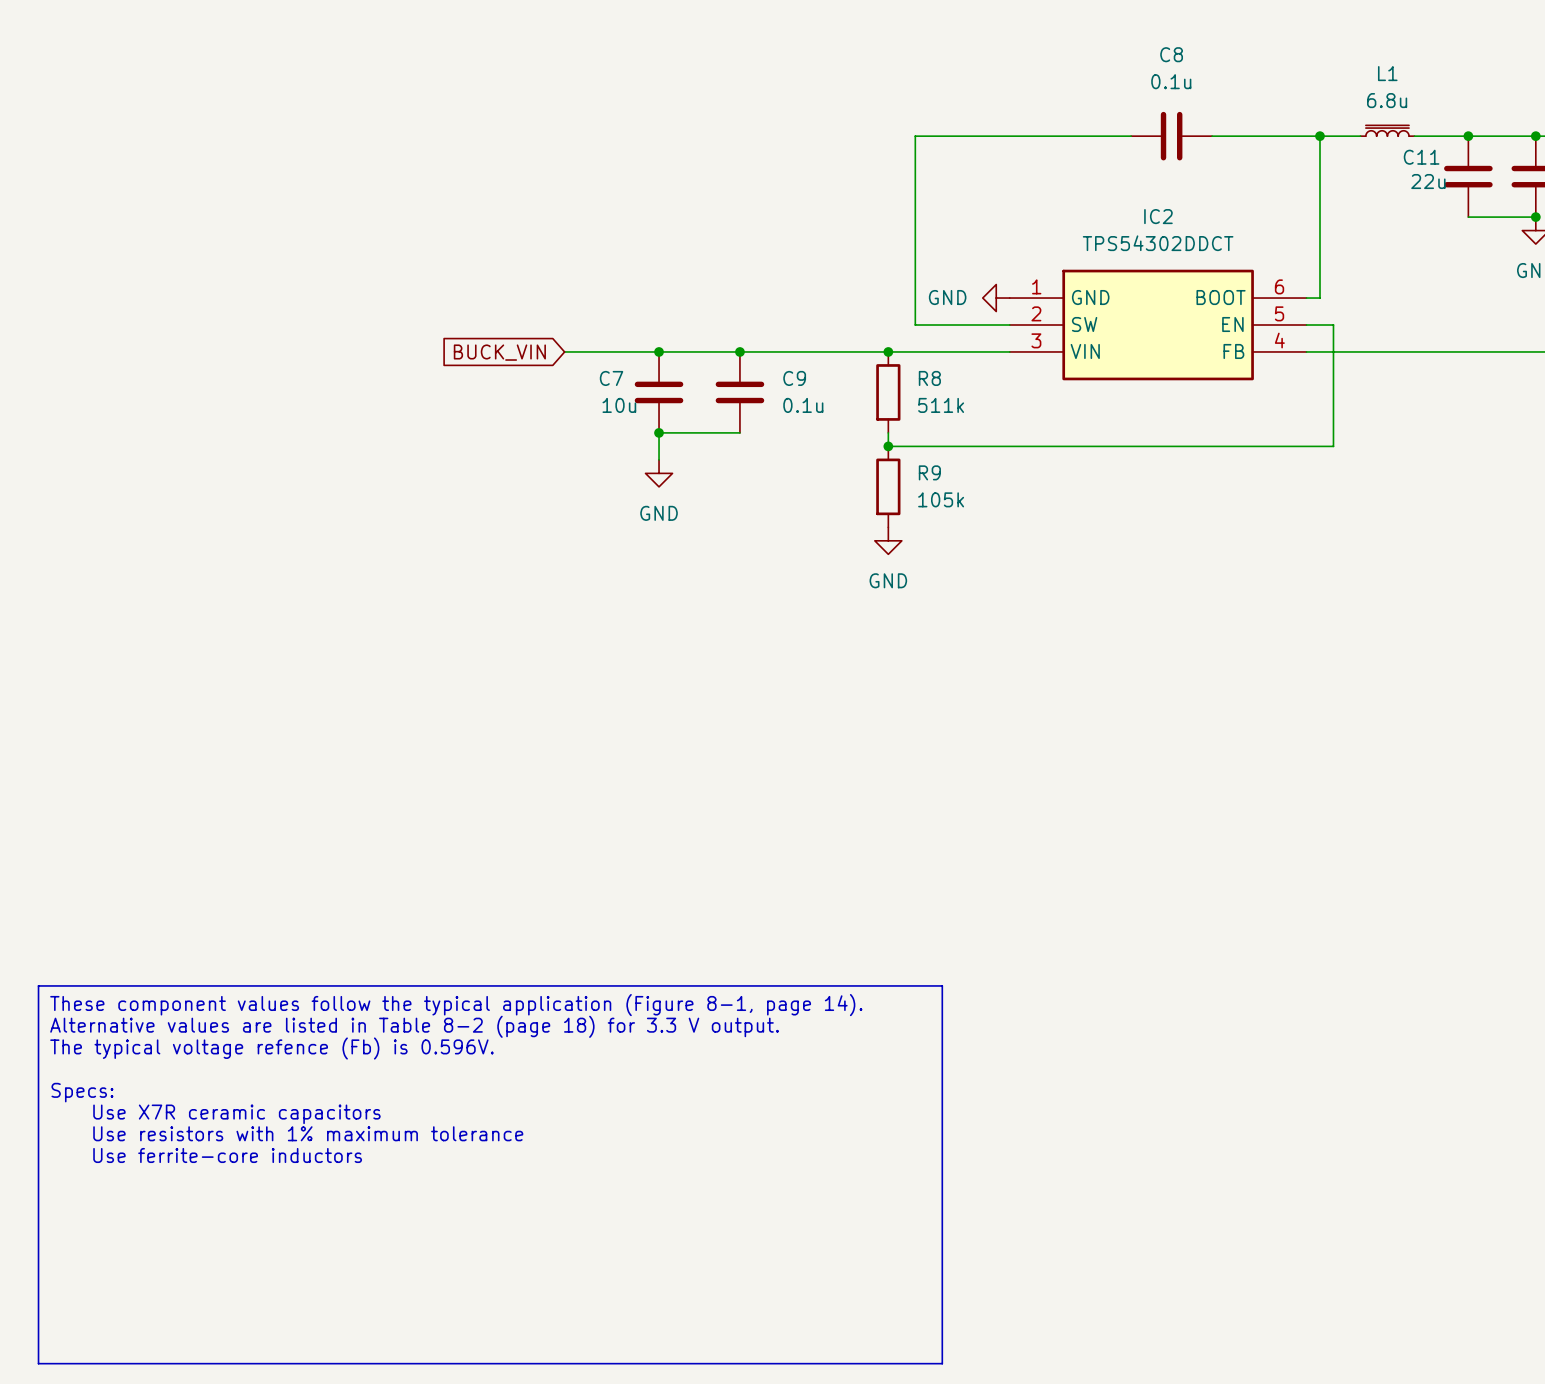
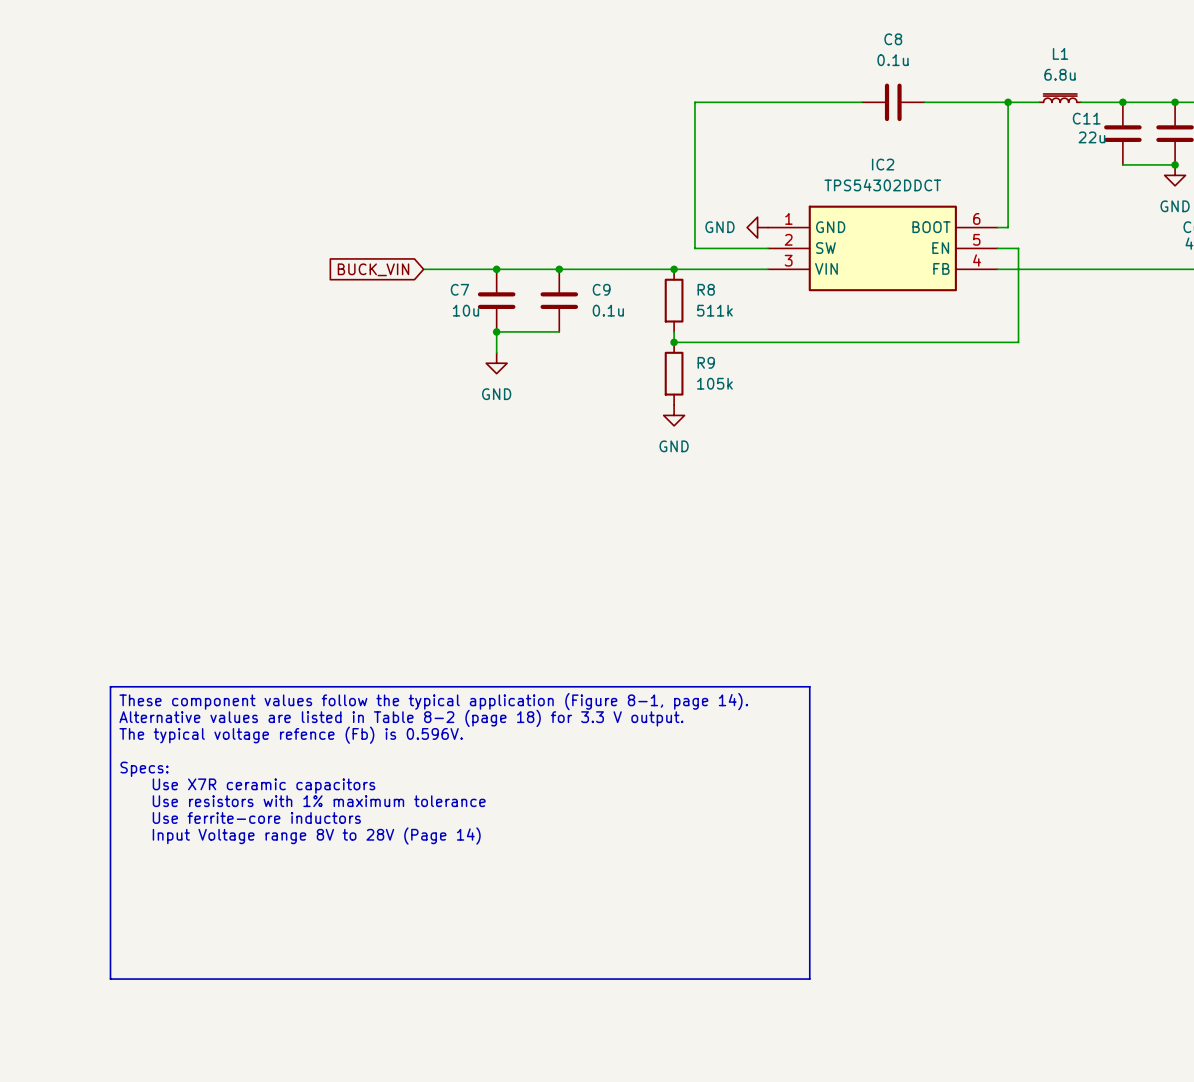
line: (38, 985) (942, 985) (942, 1363) (38, 1363) (38, 985) -> (110, 686) (809, 686) (809, 979) (110, 979) (110, 686)
text position: These component values follow the typical application (Figure 8-1, page 14). (456, 1005) -> These component values follow the typical application (Figure 8-1, page 14). (433, 701)
text position: Alternative values are listed in Table 8-2 (page 18) for 3.3 V output. (414, 1026) -> Alternative values are listed in Table 8-2 (page 18) for 3.3 V output. (401, 718)
text position: The typical voltage refence (Fb) is 0.596V. (271, 1048) -> The typical voltage refence (Fb) is 0.596V. (291, 735)
text: none -> Input Voltage range 8V to 28V (Page 14) (316, 836)
text position: Specs: (82, 1092) -> Specs: (144, 769)
text position: Use X7R ceramic capacitors (236, 1114) -> Use X7R ceramic capacitors (264, 786)
text position: Use resistors with 1% maximum tolerance (308, 1133) -> Use resistors with 1% maximum tolerance (319, 801)
text position: Use ferrite-core inductors (227, 1155) -> Use ferrite-core inductors (256, 817)

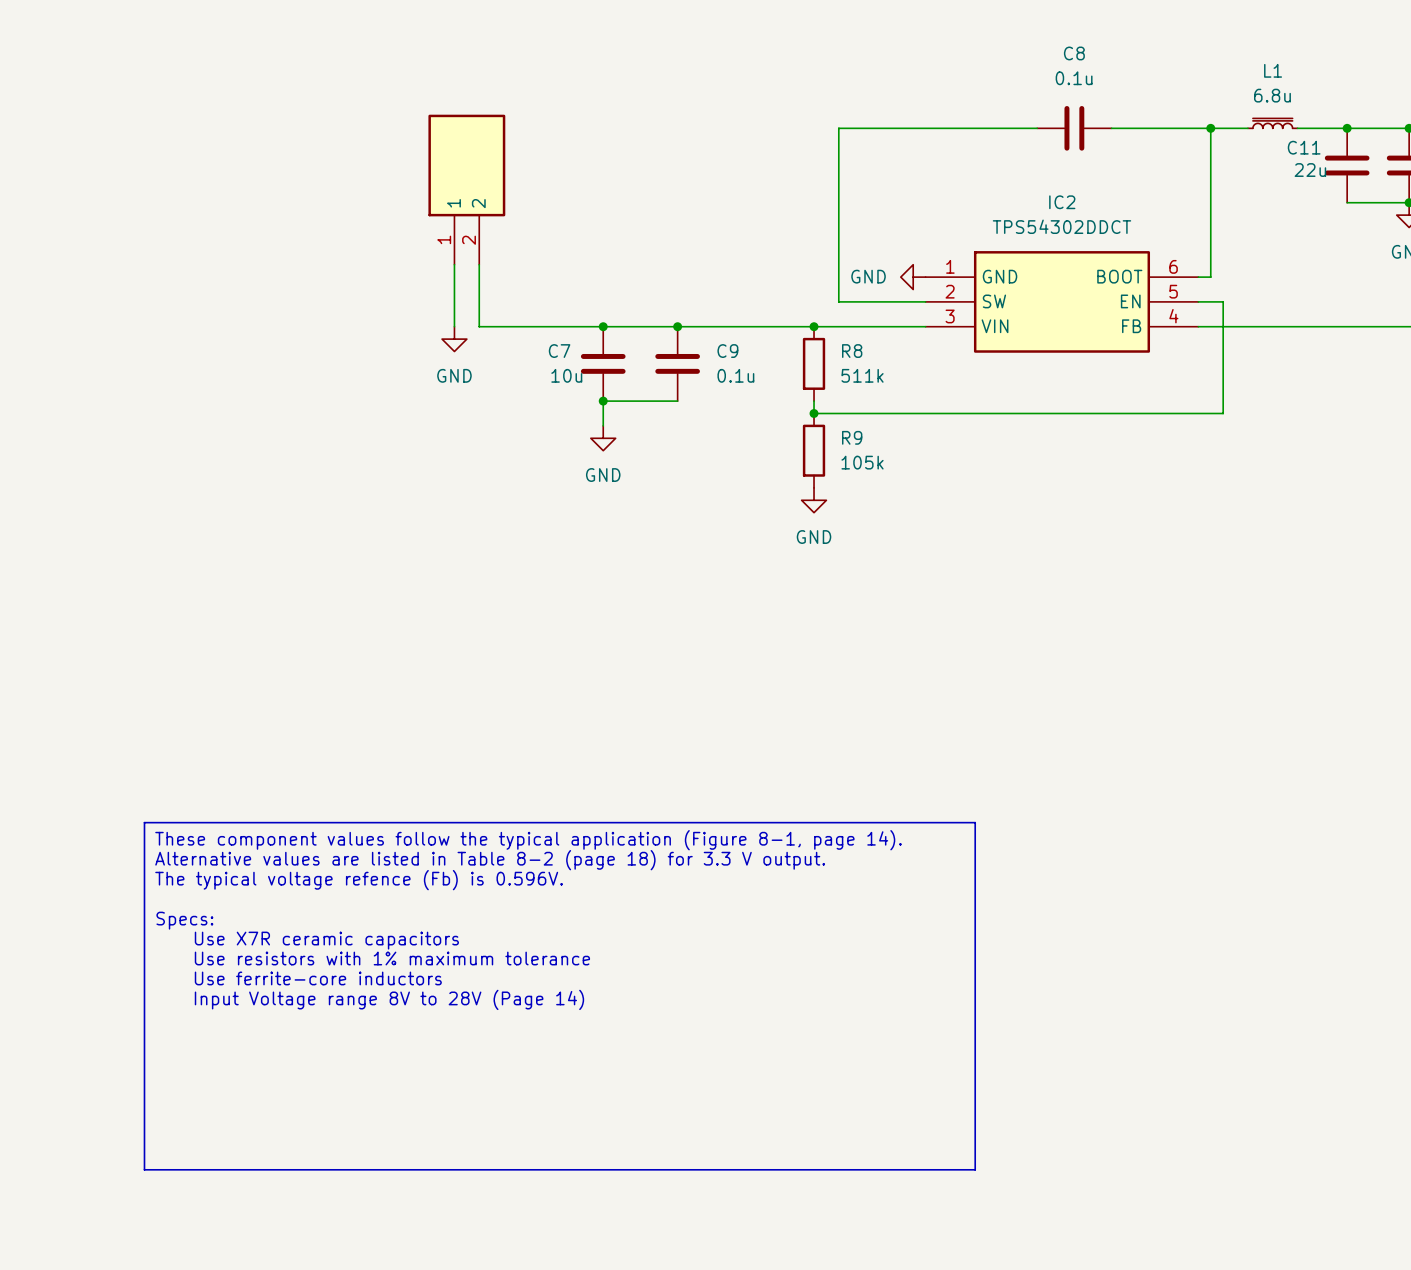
part: none -> (466, 189)
wire: none -> (454, 264) (454, 326)
wire: none -> (479, 264) (479, 326) (516, 326)
global label: BUCK_VIN (373, 269) -> none
power symbol: none -> GND (454, 339)

